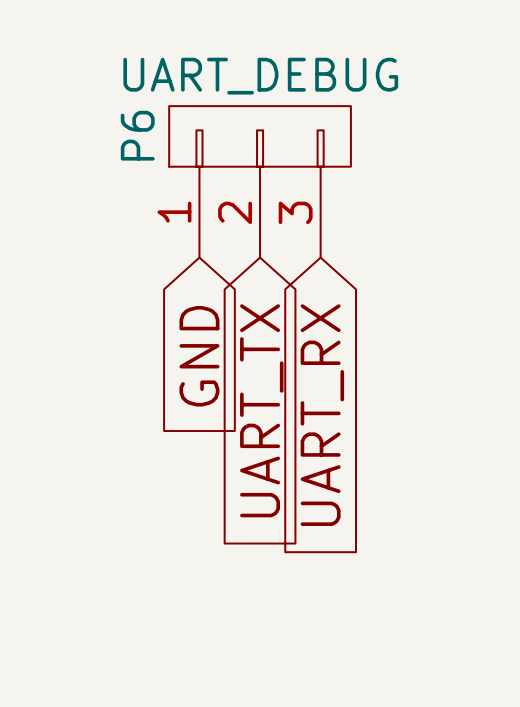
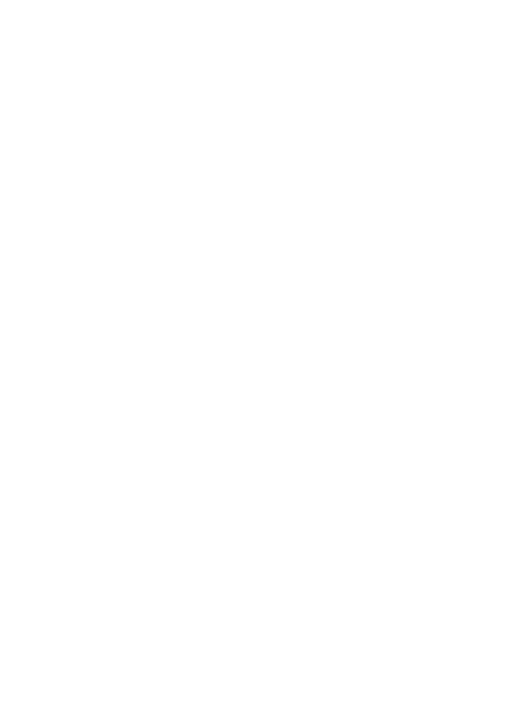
P6: UART_DEBUG (260, 181) -> none
global label: GND (199, 356) -> none
global label: UART_TX (261, 410) -> none
global label: UART_RX (322, 415) -> none

